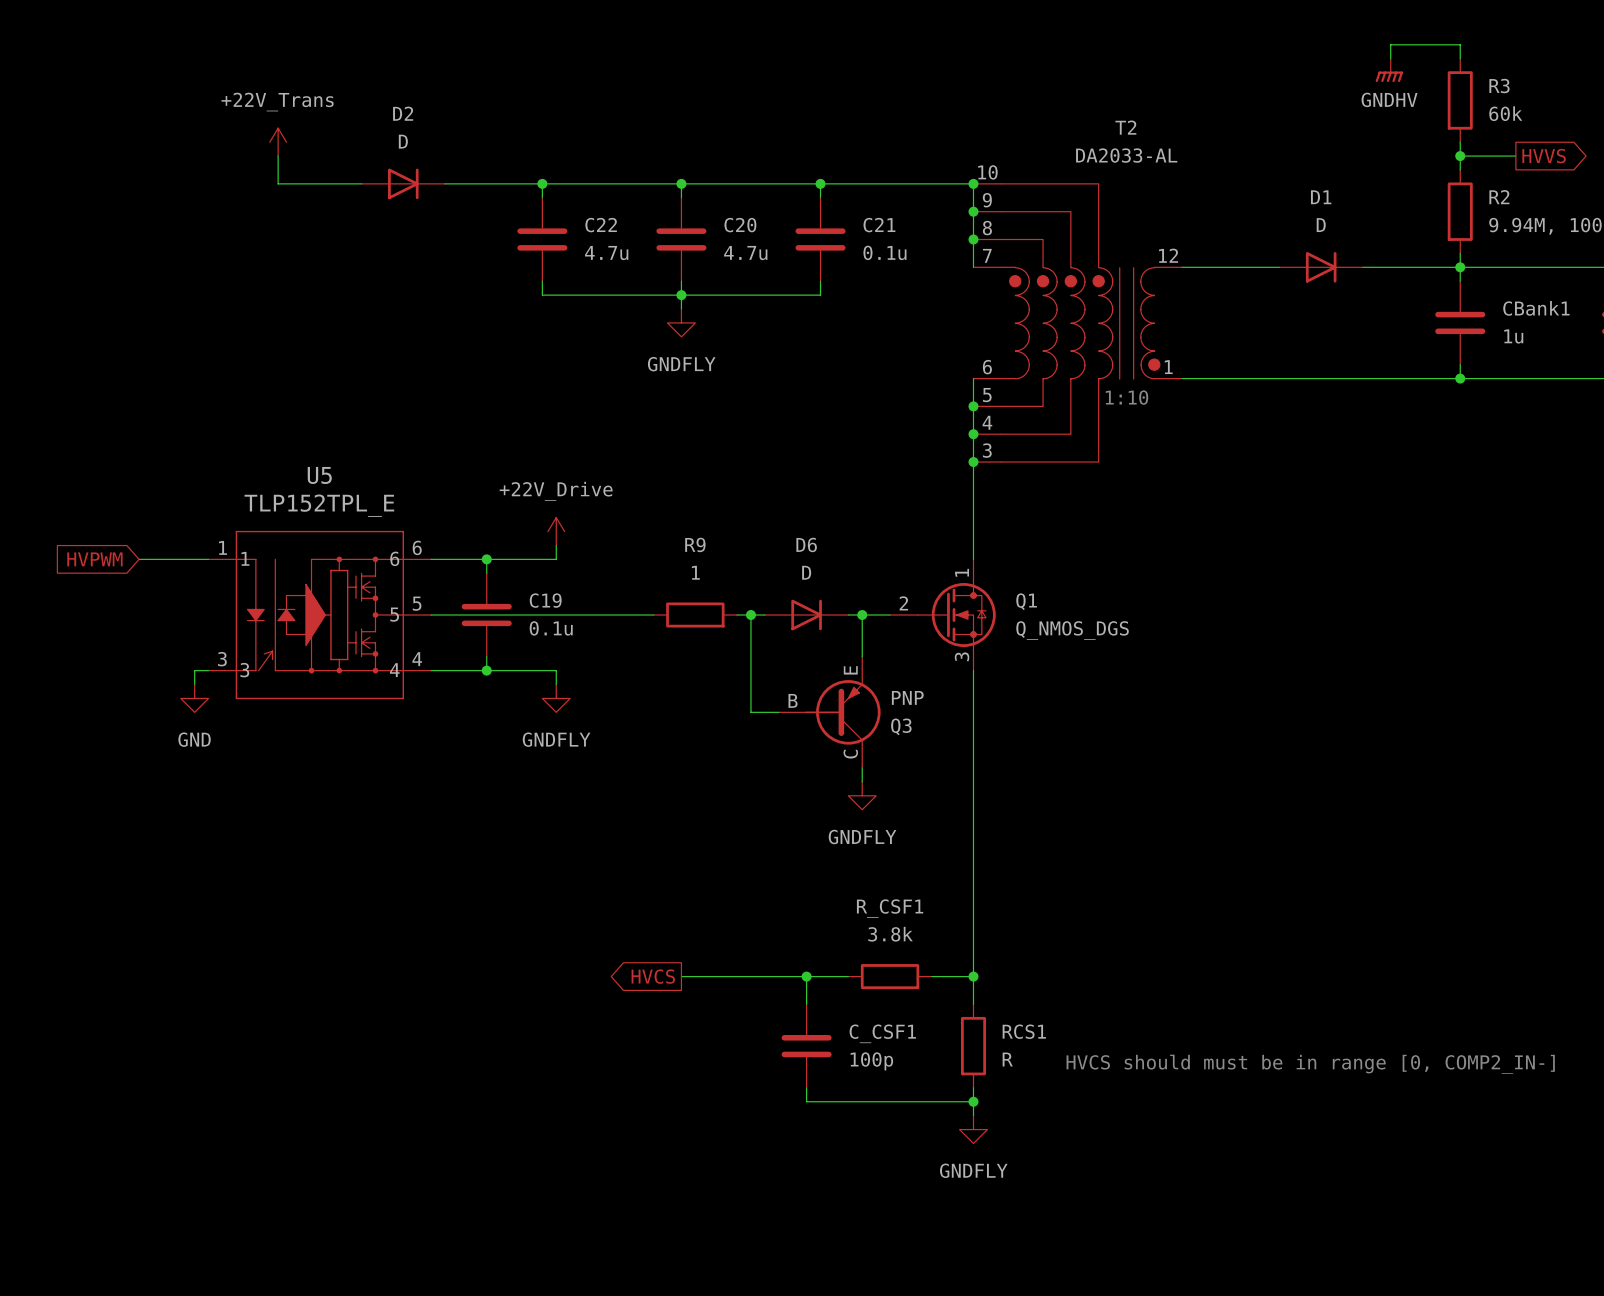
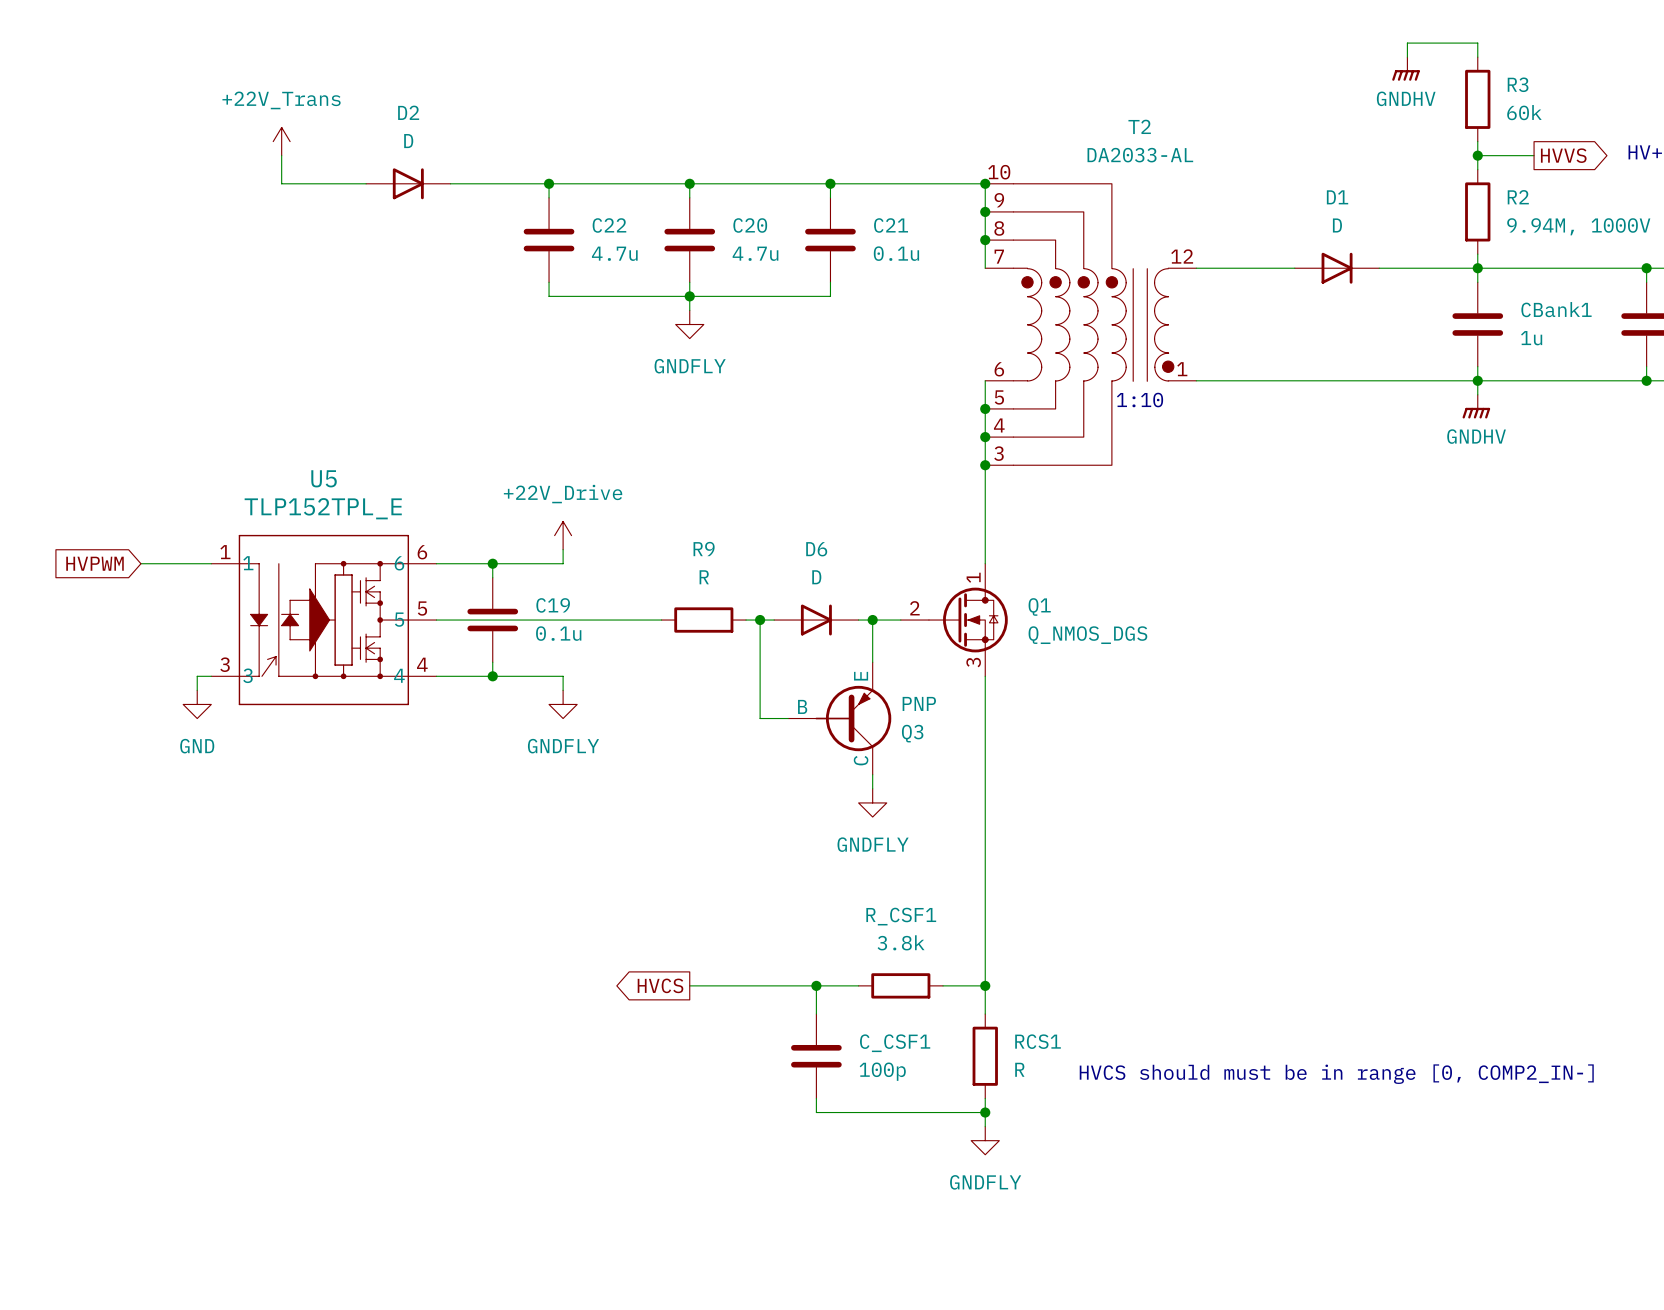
wire: none -> (1477, 380) (1477, 394)
power symbol: none -> GNDHV (1476, 406)
R9 value: 1 (695, 572) -> R (704, 577)

